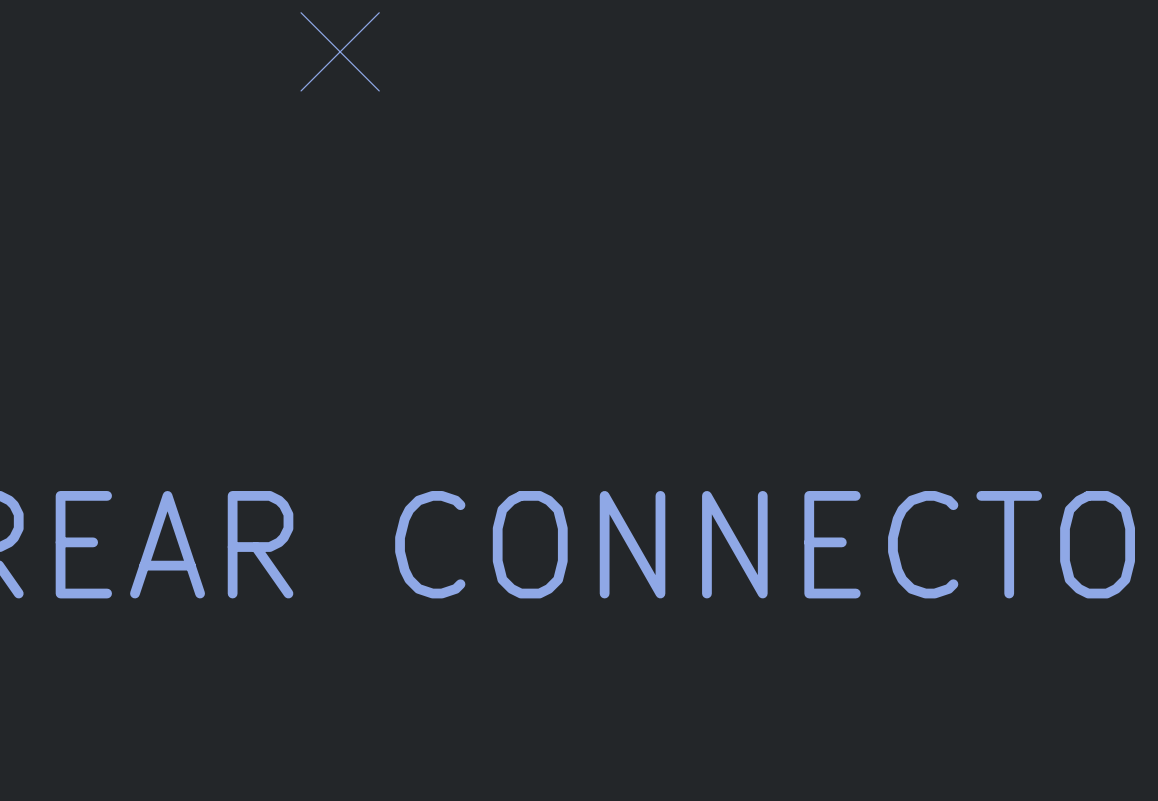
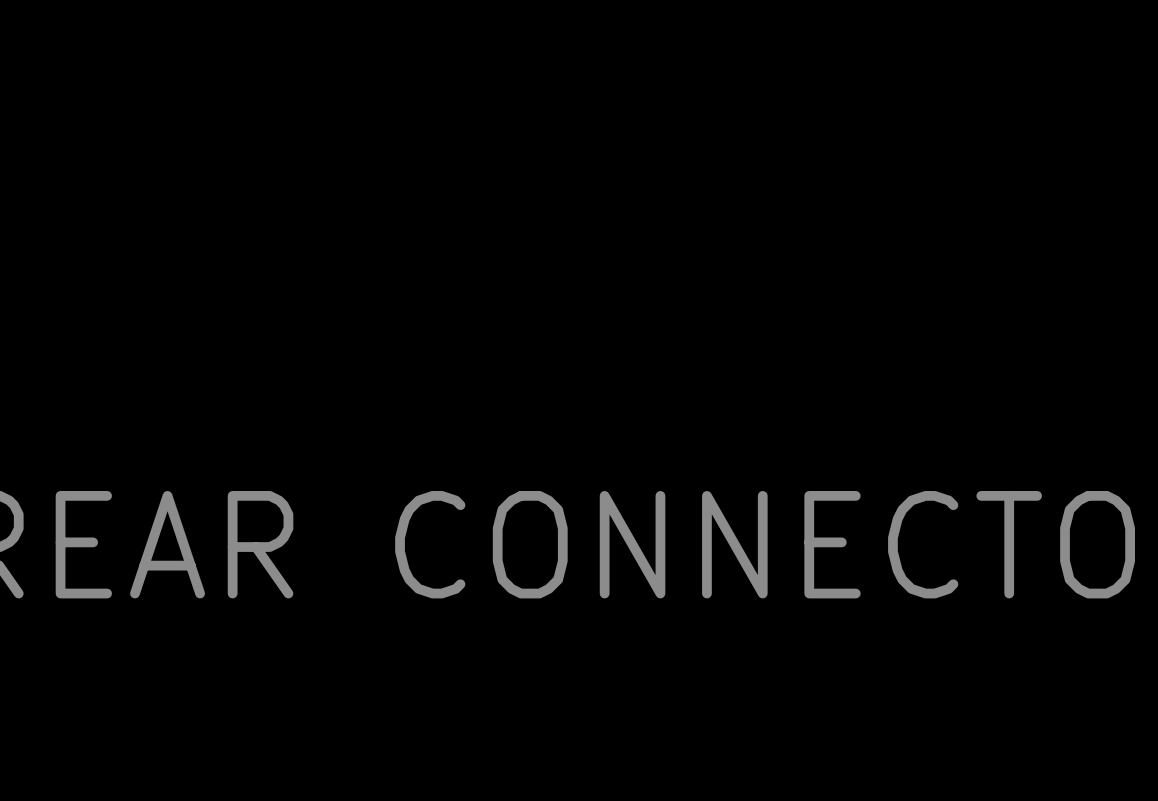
no-connect mark: (340, 51) -> none

